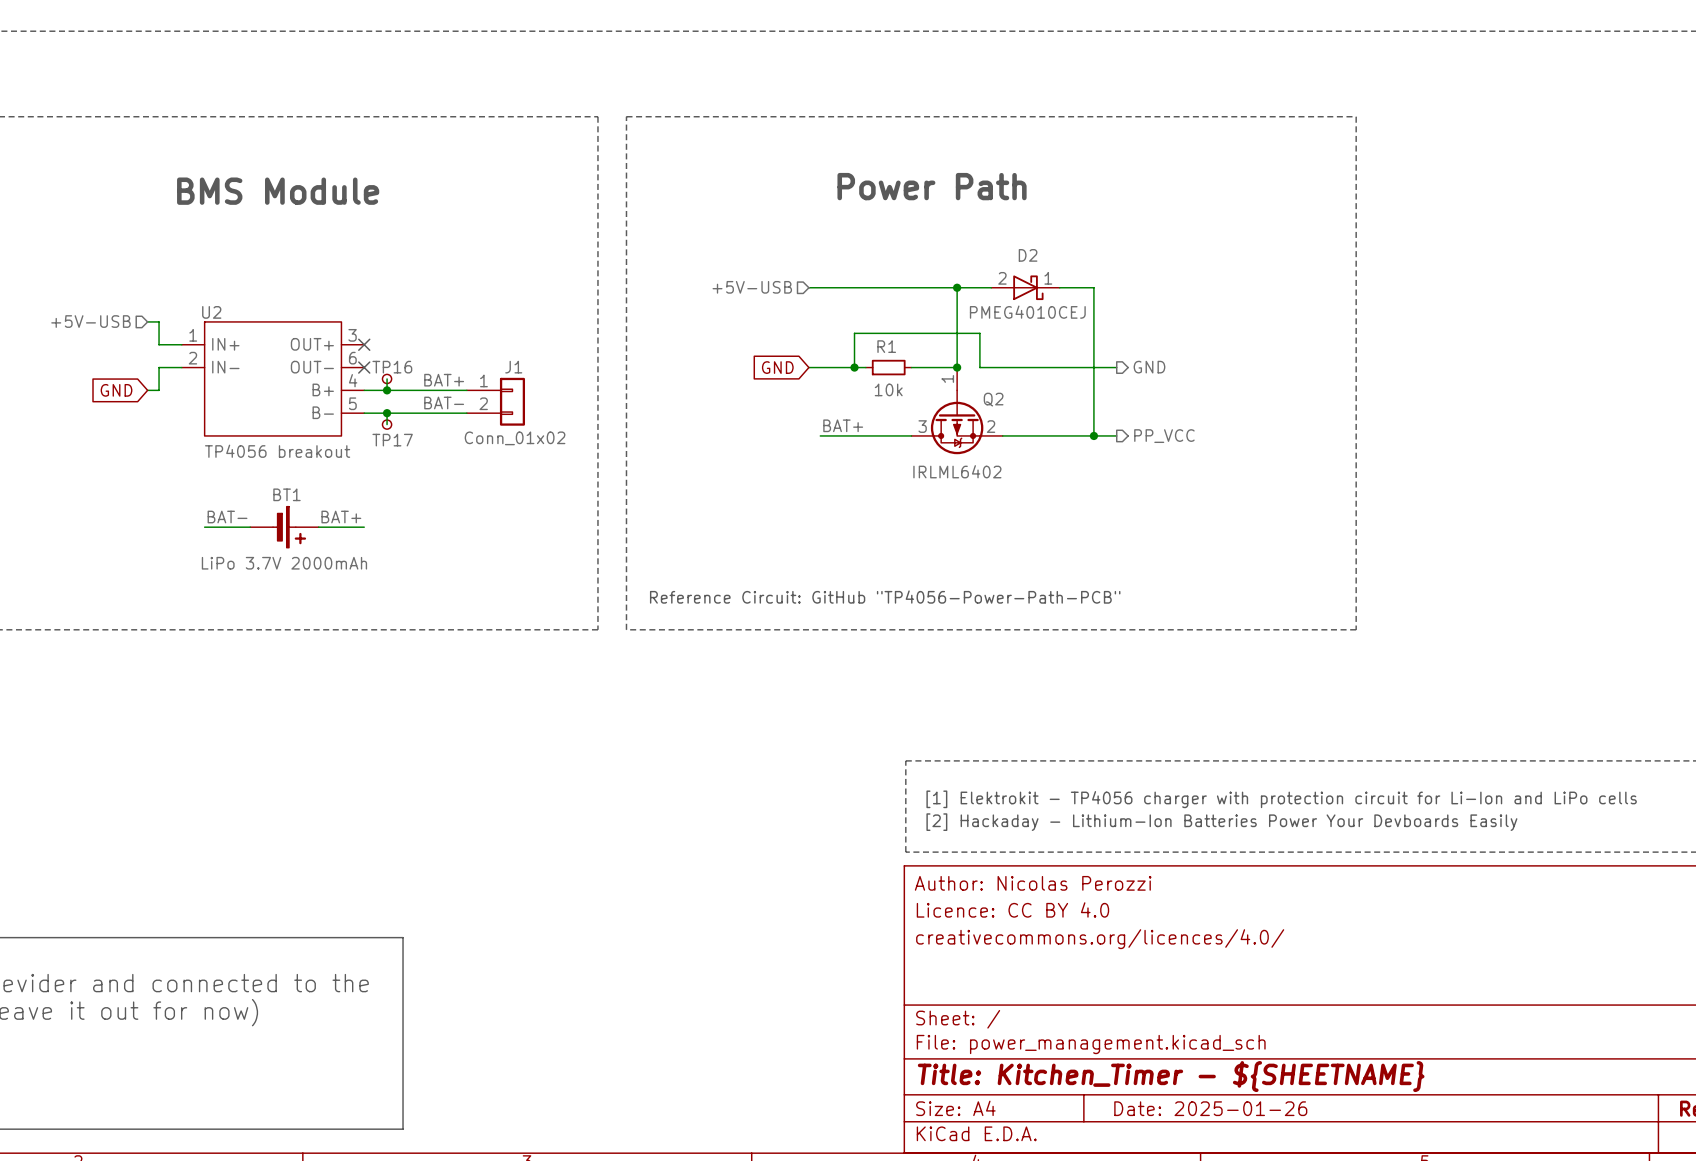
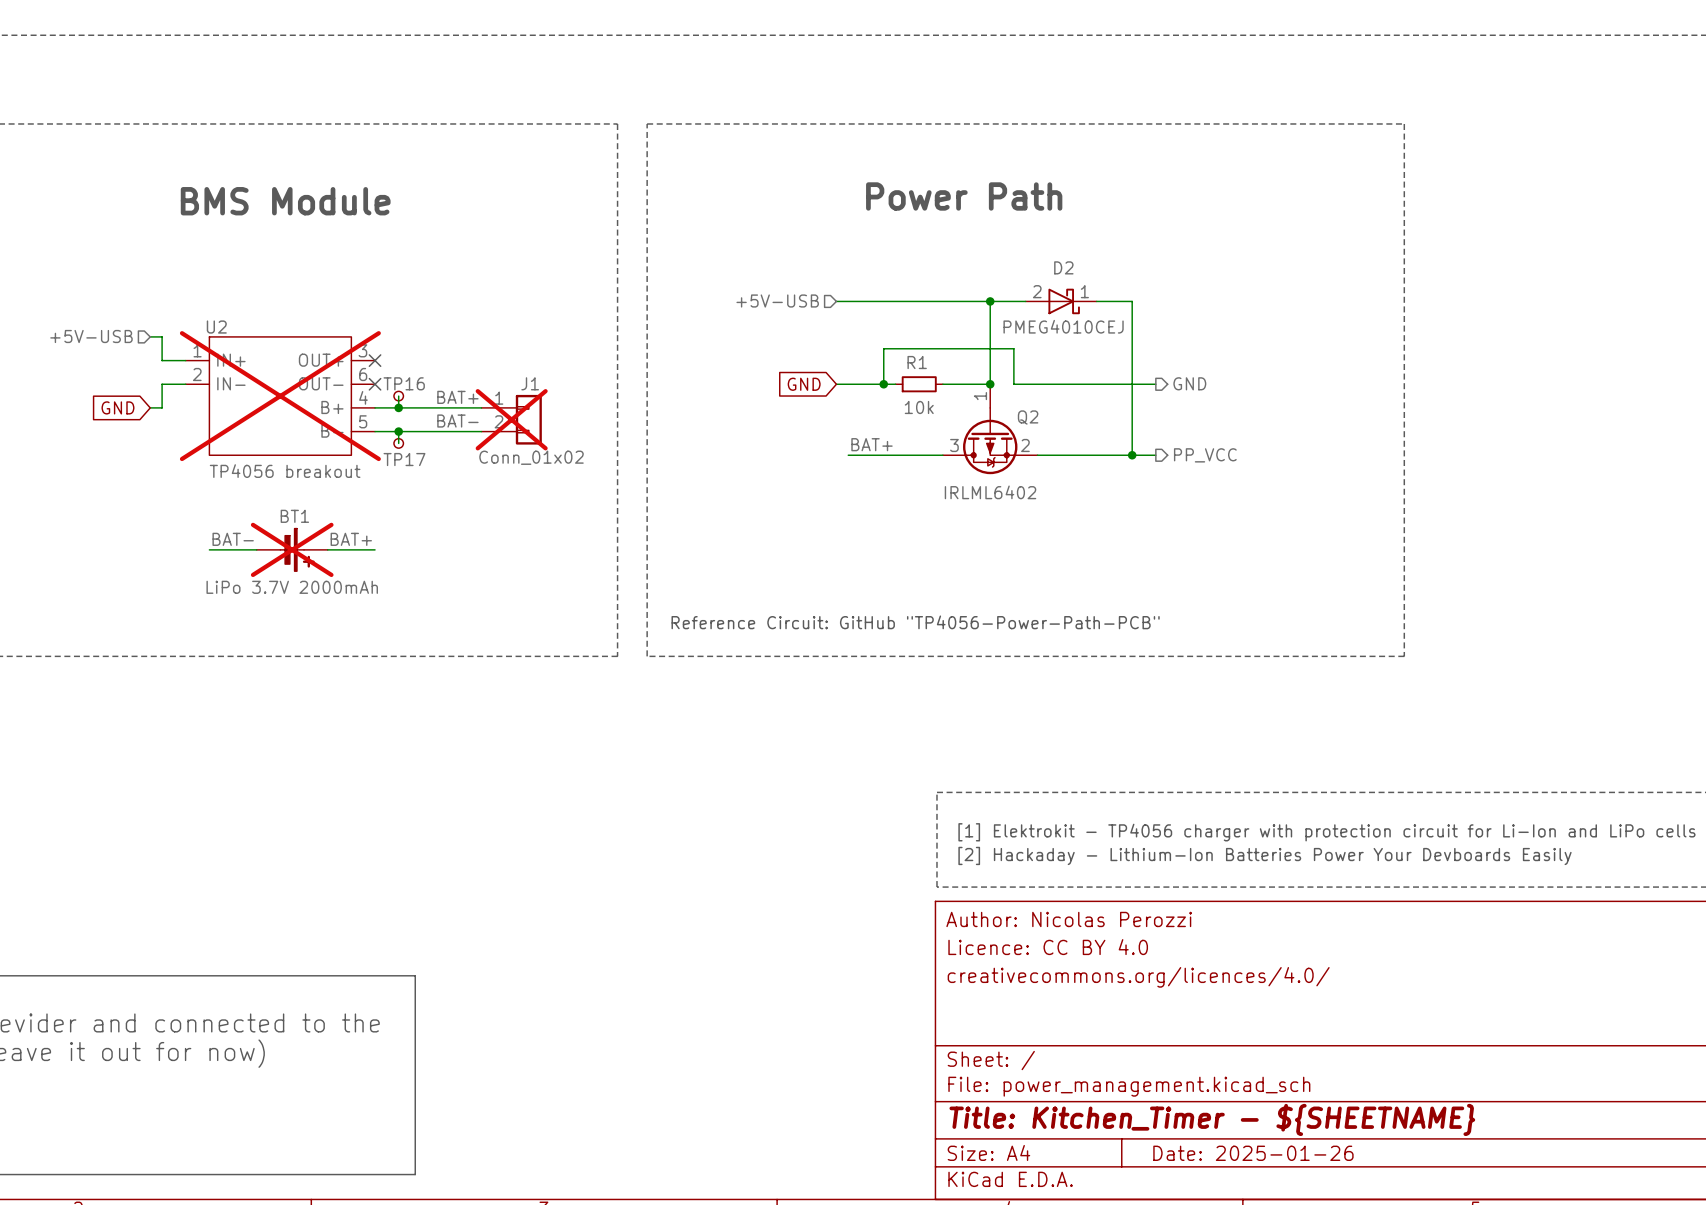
U2 do-not-place cross: none -> (280, 396)
J1 do-not-place cross: none -> (511, 419)
BT1 do-not-place cross: none -> (292, 549)

